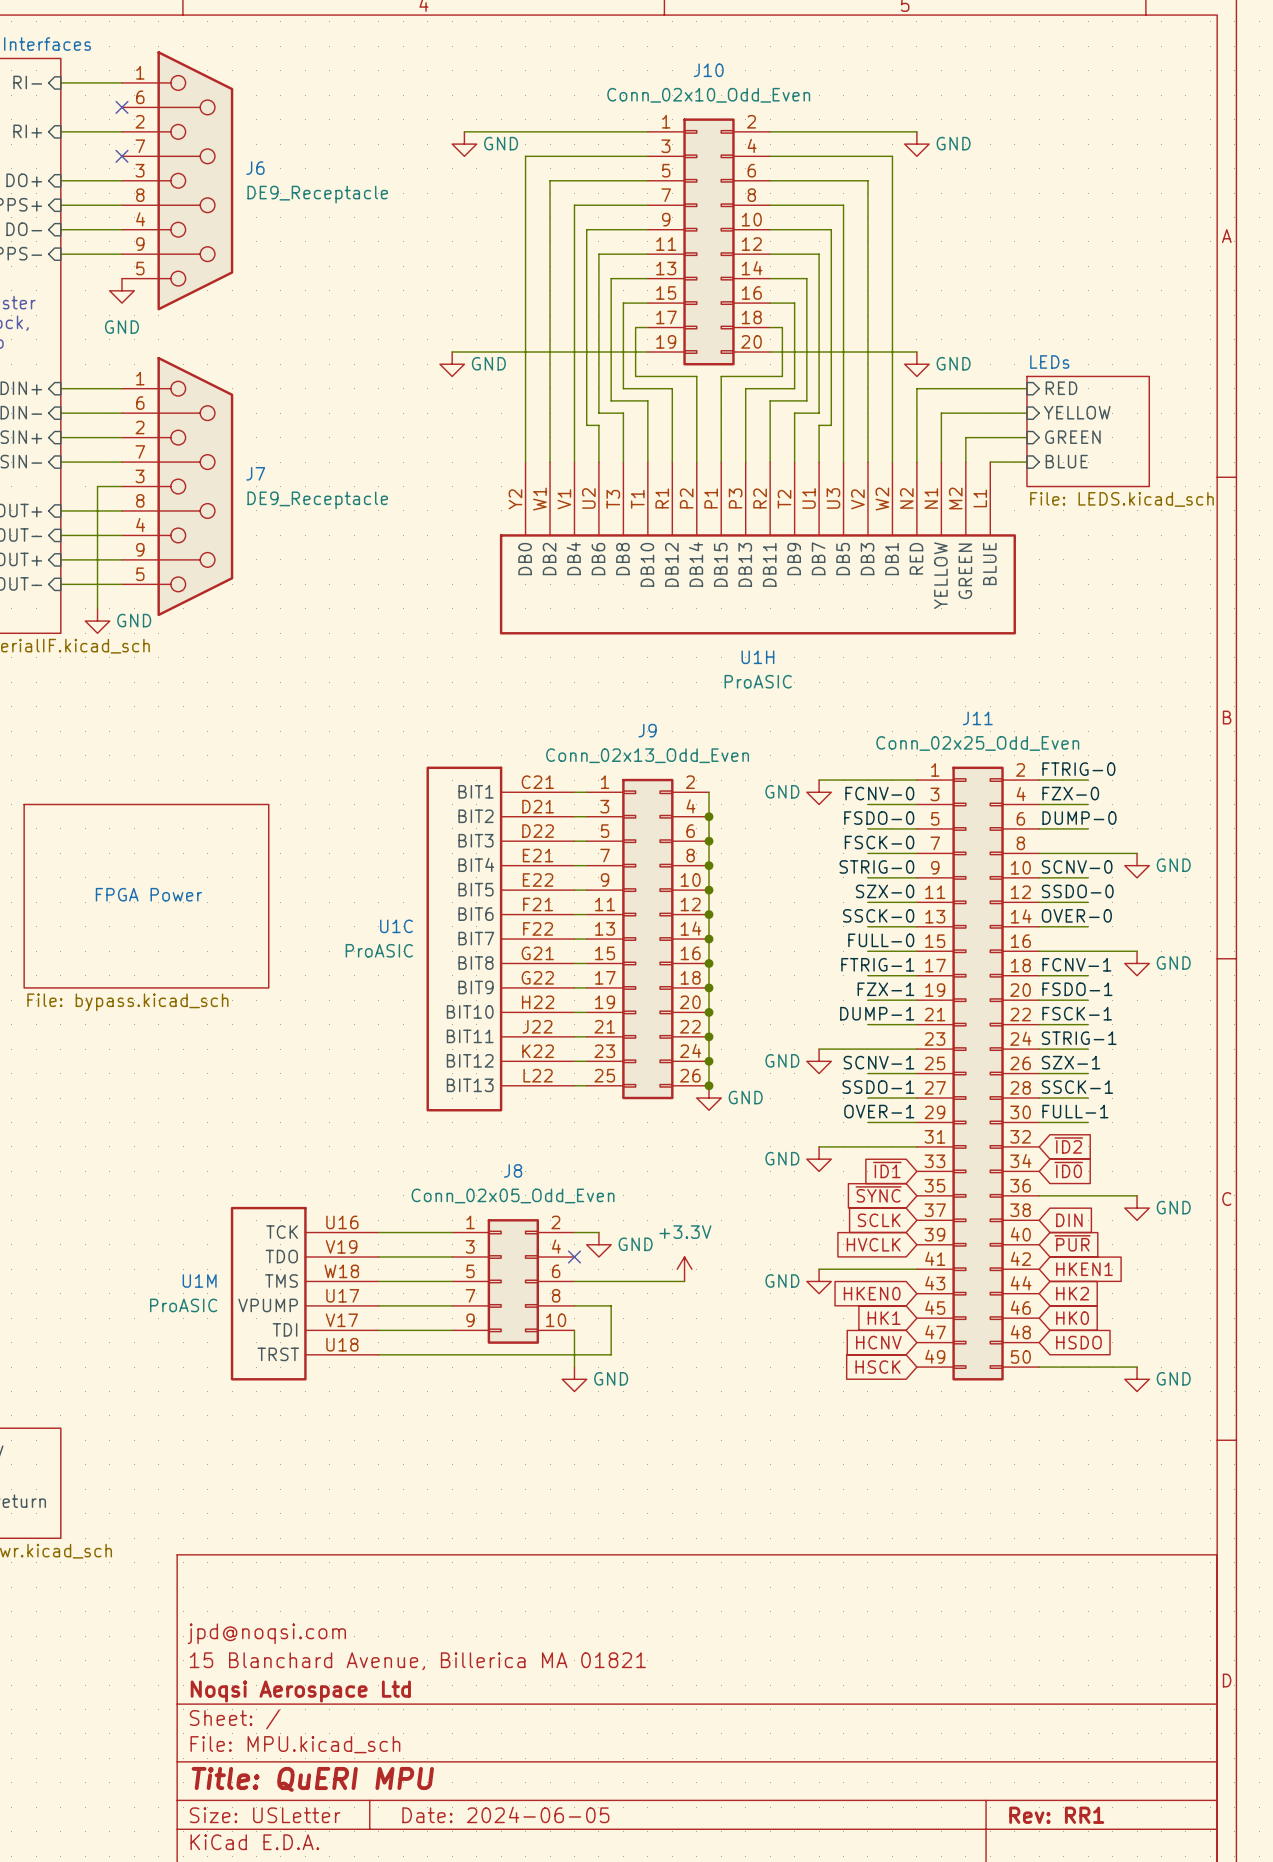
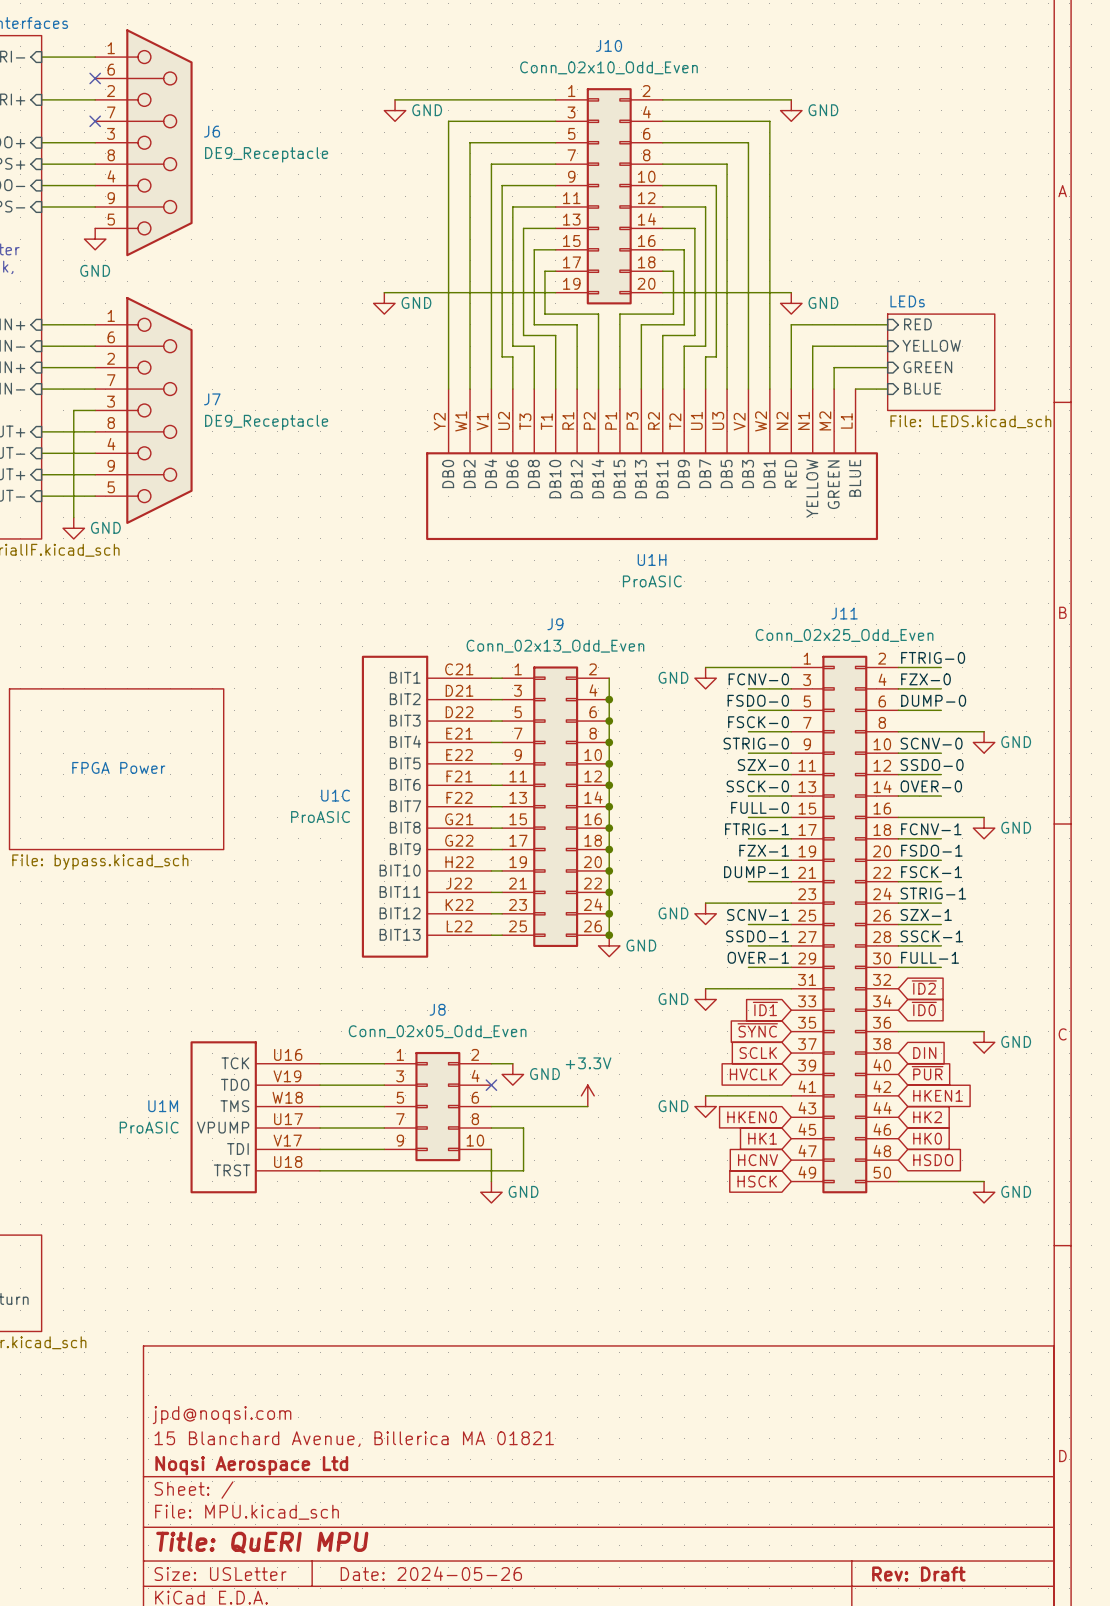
title block: Date: 2024-06-05 (505, 1814) -> Date: 2024-05-26 (431, 1573)
title block: Rev: RR1 (1056, 1815) -> Rev: Draft (918, 1574)

